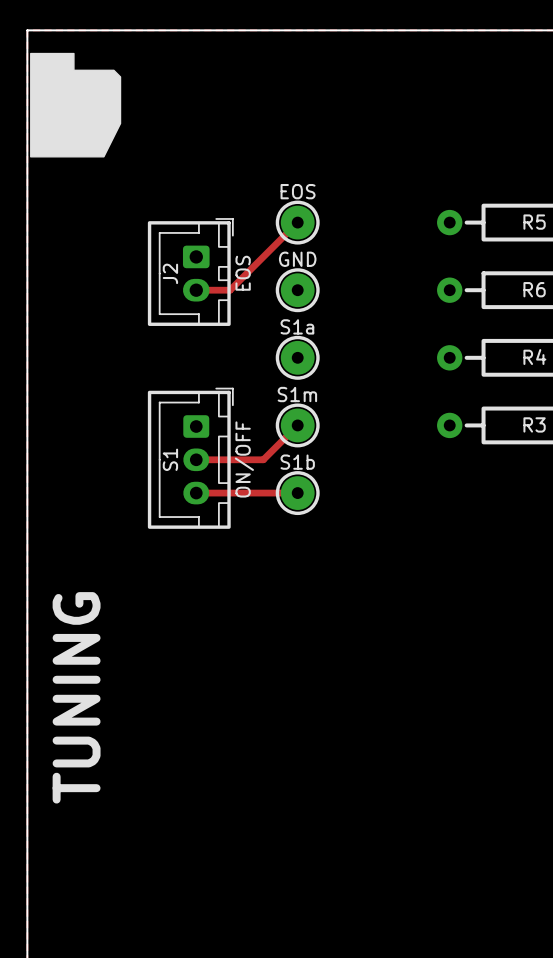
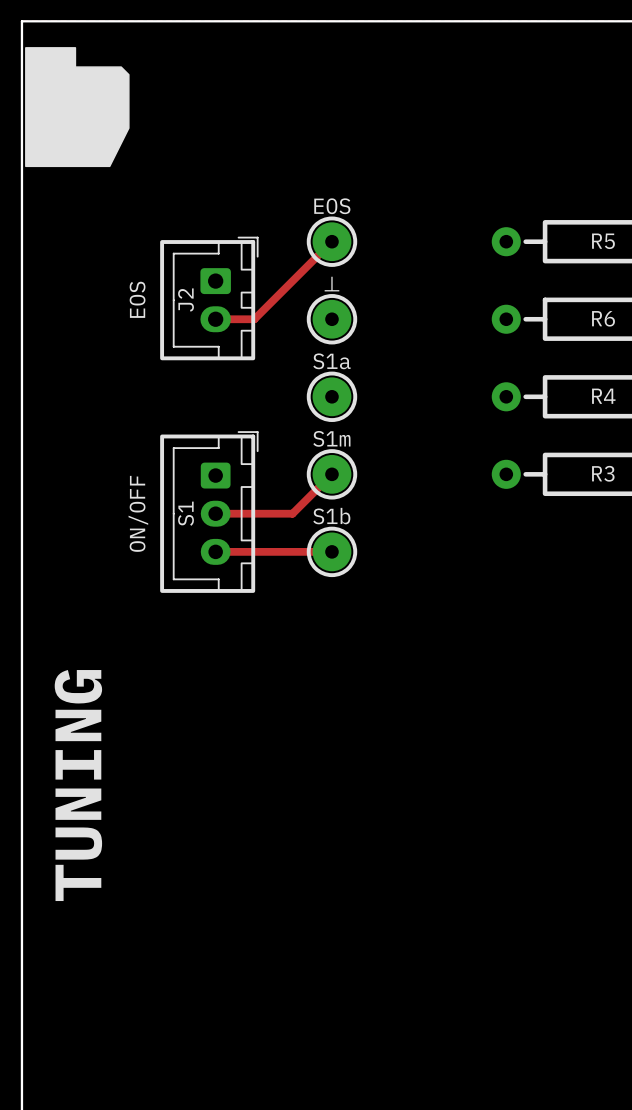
part value: GND (297, 259) -> ⊥ (331, 284)
J2 text position: EOS (243, 273) -> EOS (137, 299)
S1 text position: ON/OFF (244, 459) -> ON/OFF (138, 513)

